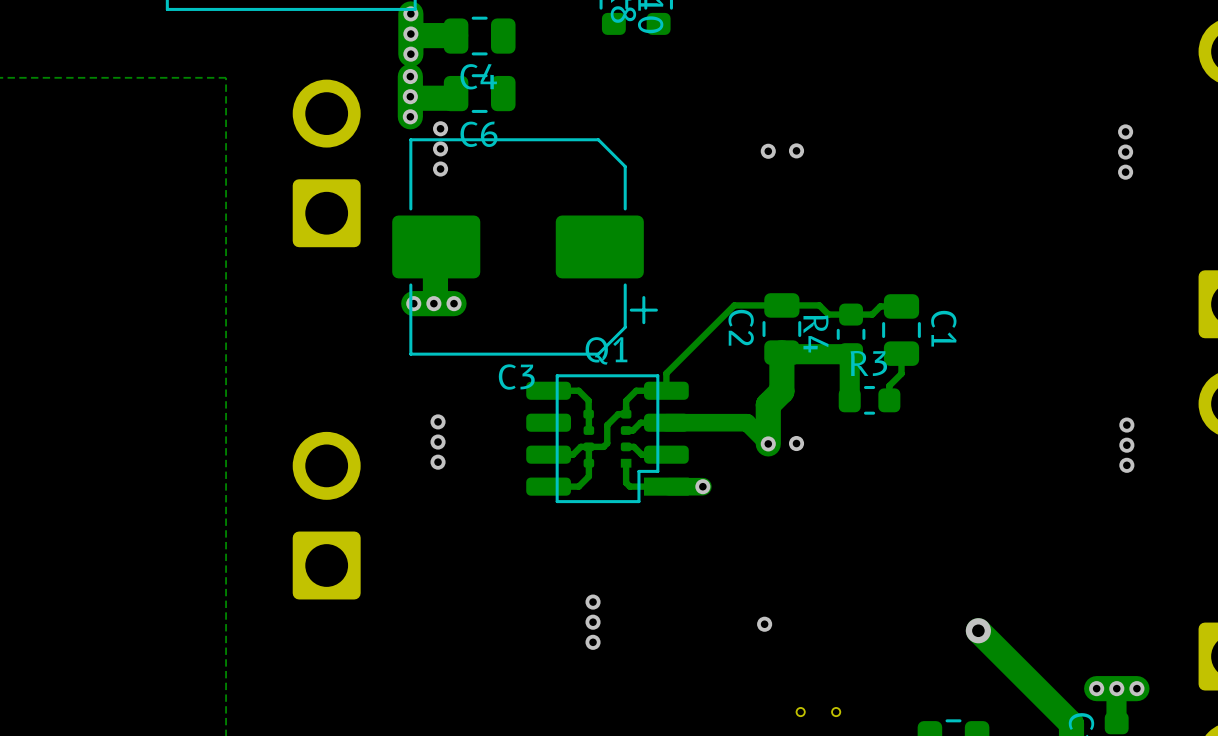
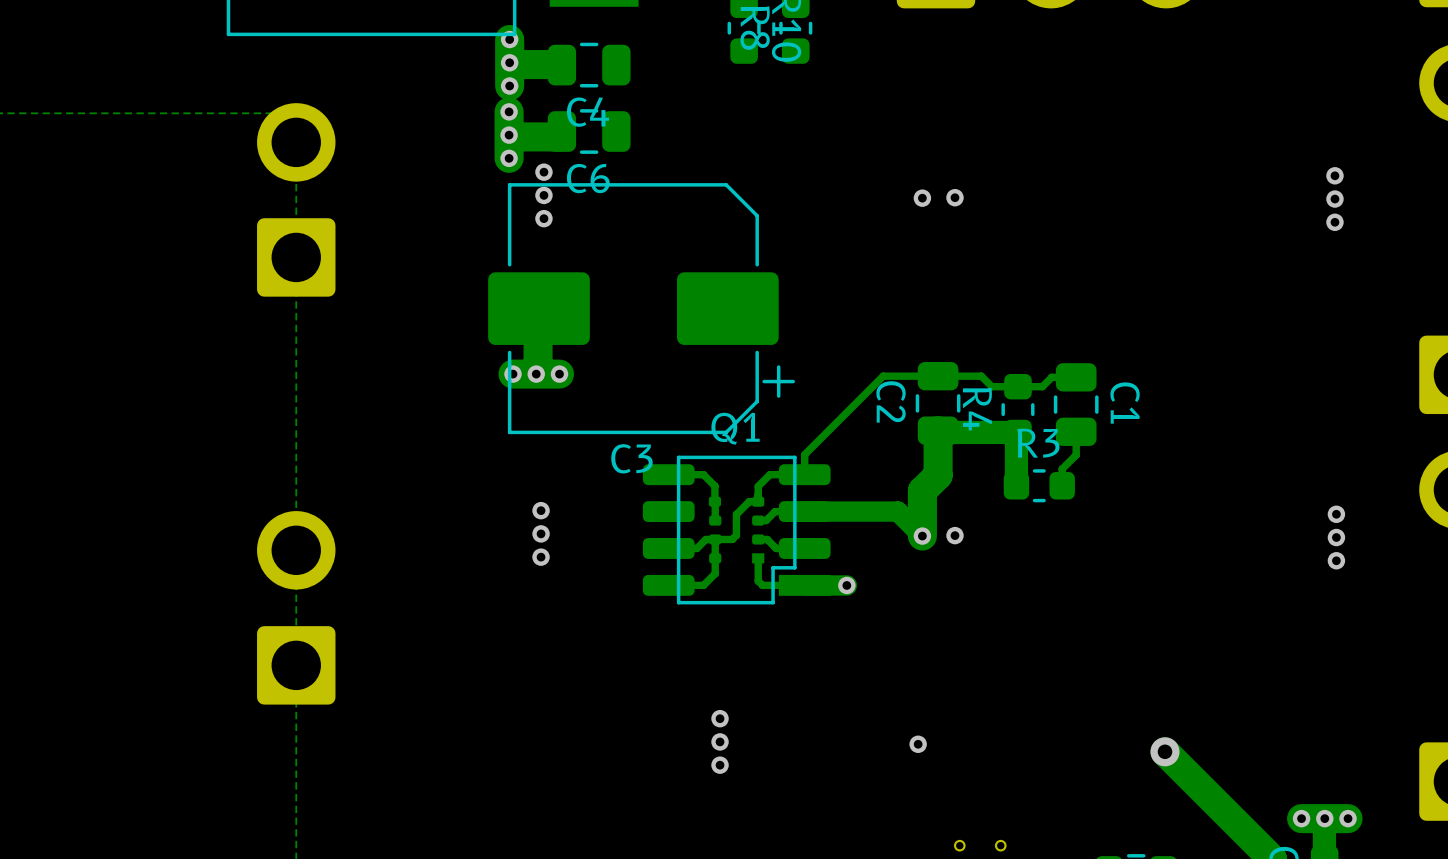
part position: (326, 163) -> (296, 199)
part position: (326, 515) -> (296, 607)

